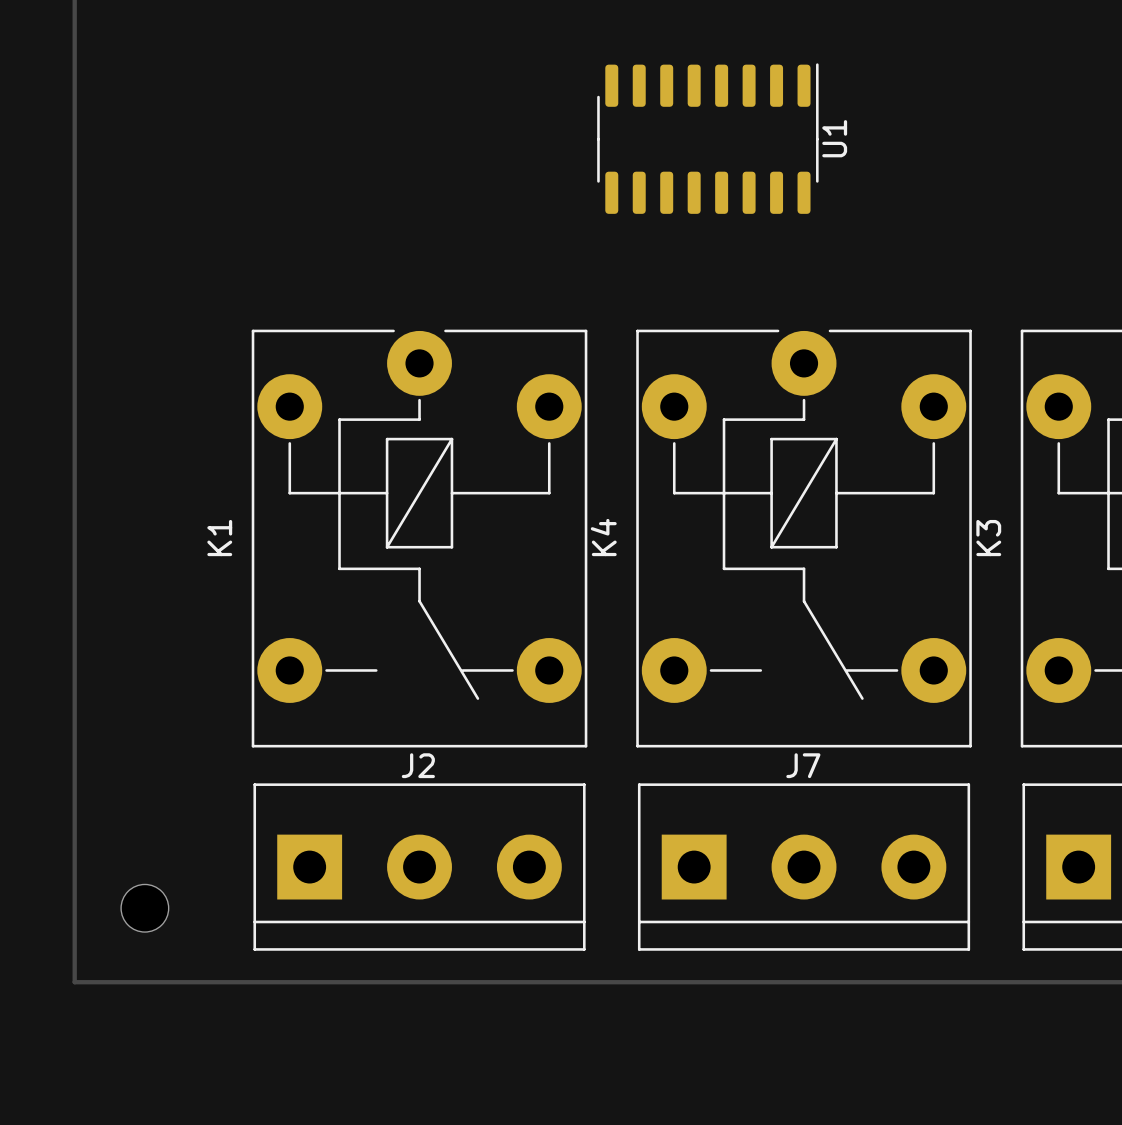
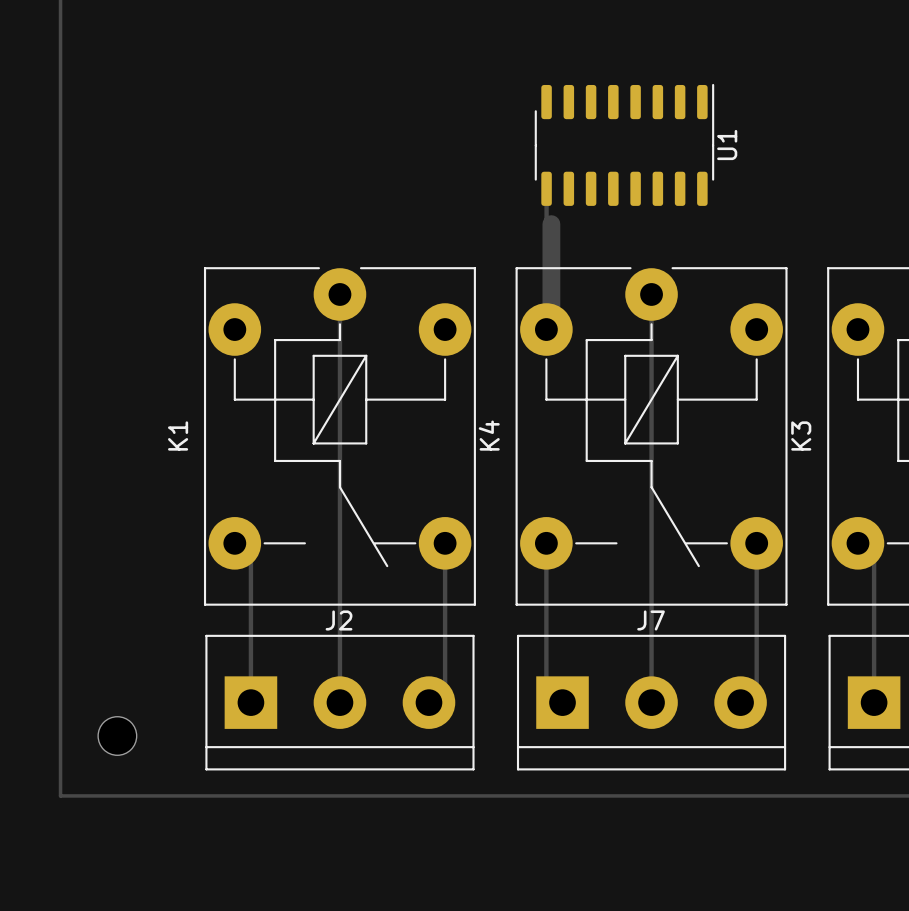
U1 position: (707, 138) -> (624, 144)
track: none -> (546, 188) (546, 219) (551, 224) (551, 313) (546, 318) (546, 329) (551, 324)
track: none -> (339, 294) (339, 702)
track: none -> (651, 294) (651, 702)
track: none -> (234, 543) (250, 559) (250, 702)
track: none -> (445, 543) (445, 686) (428, 702)
track: none -> (546, 543) (546, 686) (562, 702)
track: none -> (756, 543) (756, 686) (740, 702)
track: none -> (857, 543) (874, 559) (874, 702)

